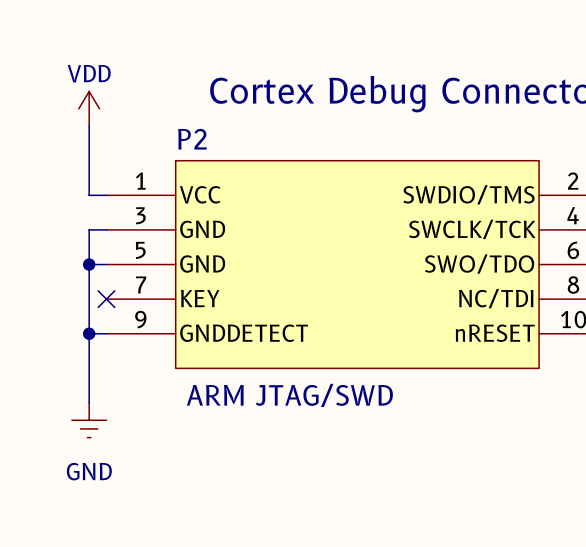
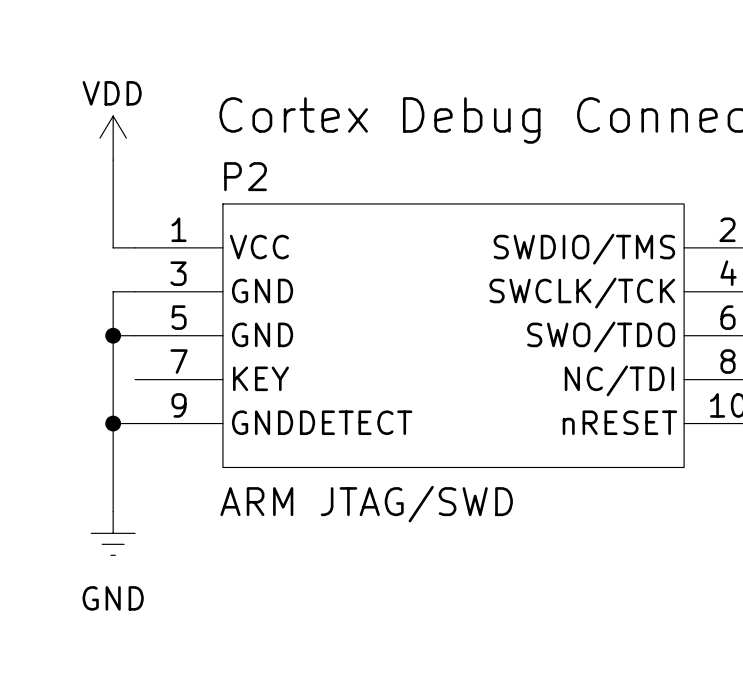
no-connect mark: (106, 299) -> none

